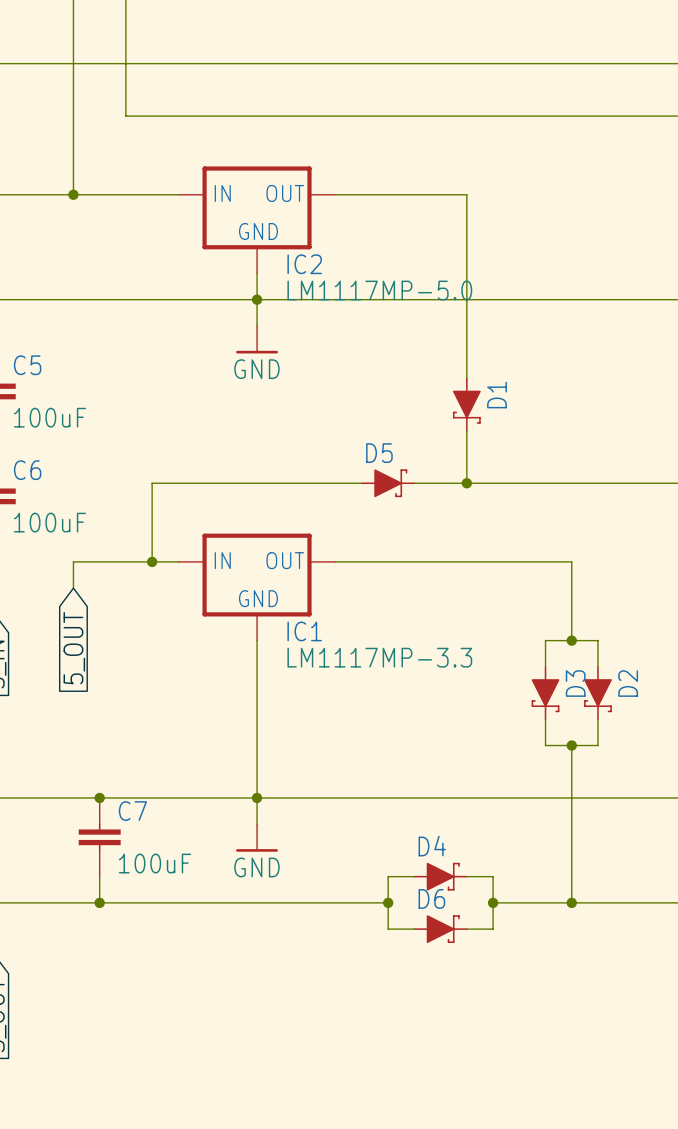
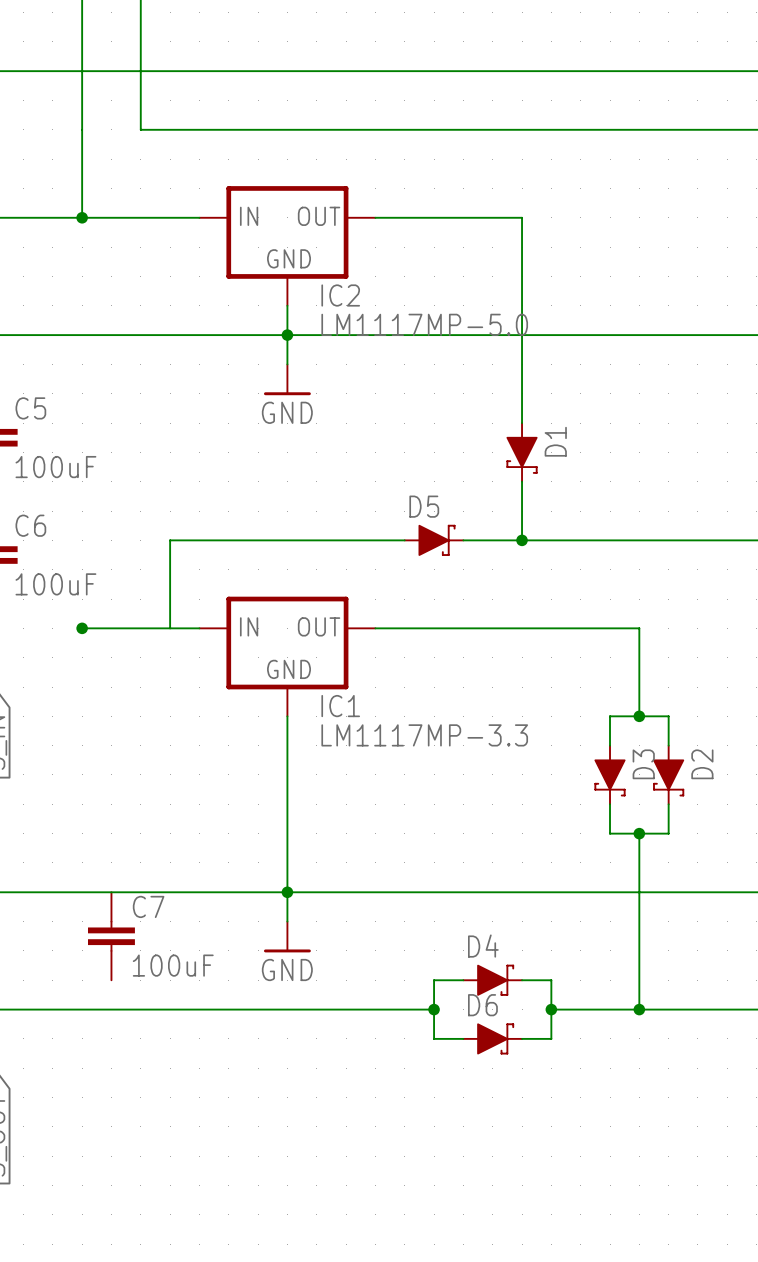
wire: (73, 561) (73, 588) -> none
junction: none -> (82, 628)
junction: (152, 561) -> none
global label: 5_OUT (74, 648) -> none
junction: (99, 797) -> none
wire: (99, 876) (99, 902) -> none
junction: (99, 902) -> none

